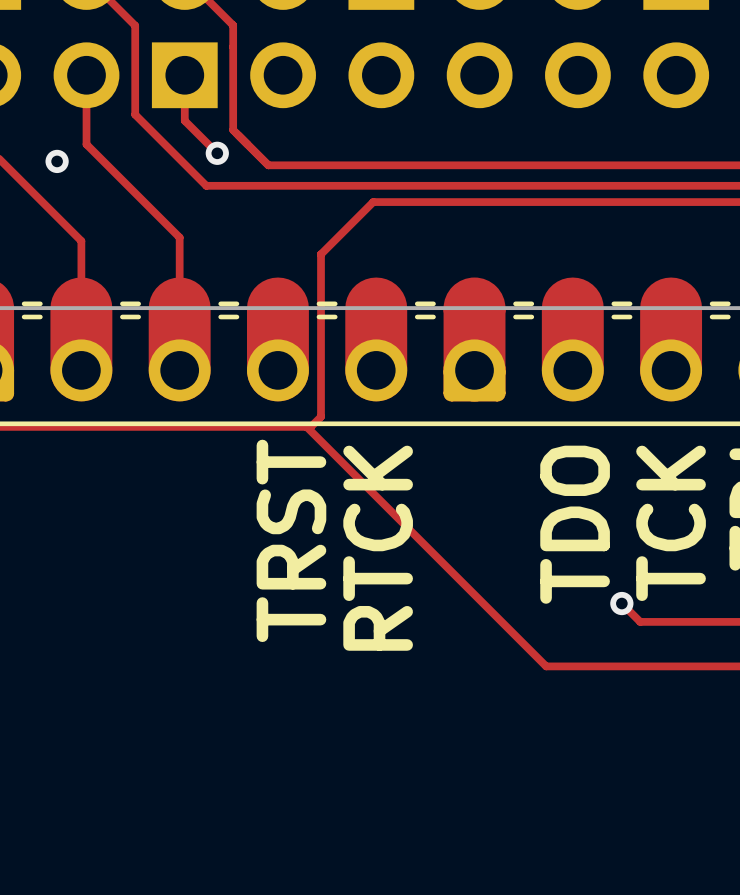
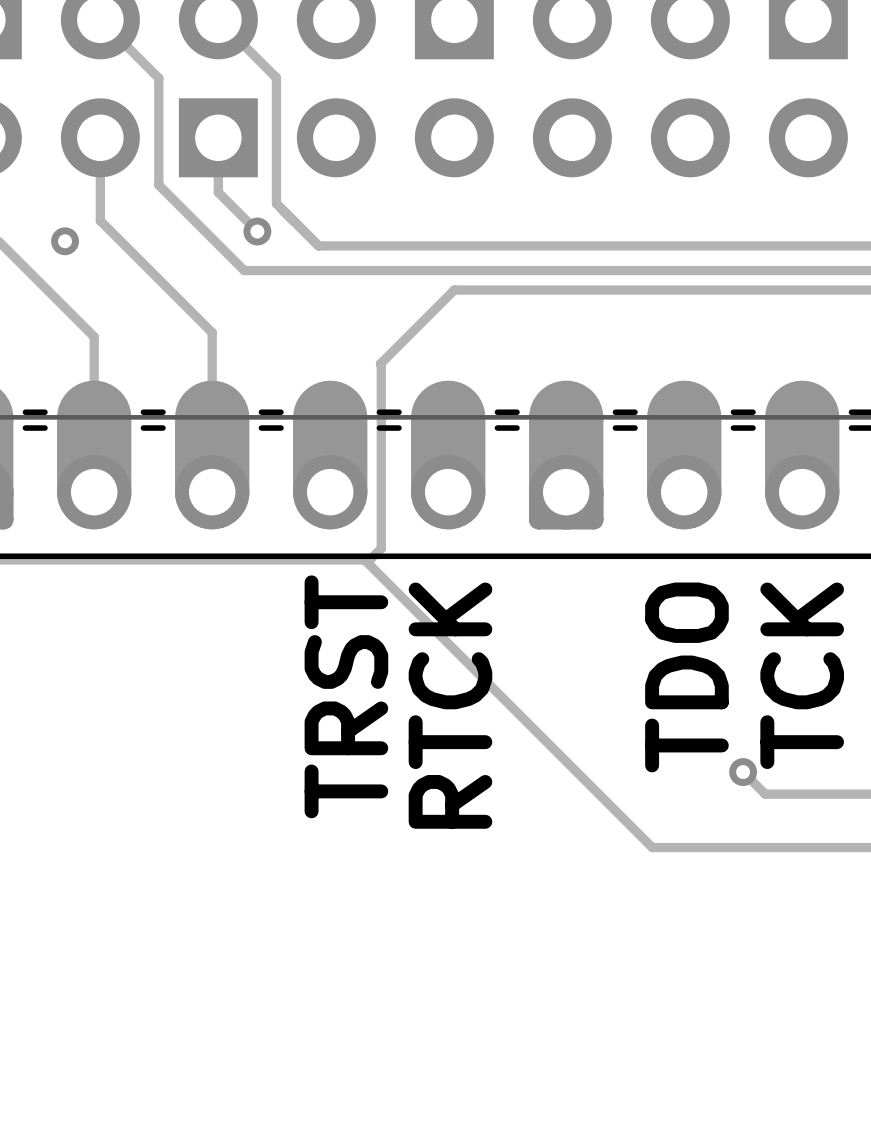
track: (381, 202) (373, 202) (320, 254) -> none
track: (321, 254) (321, 416) -> (454, 290) (380, 363) (381, 548)

